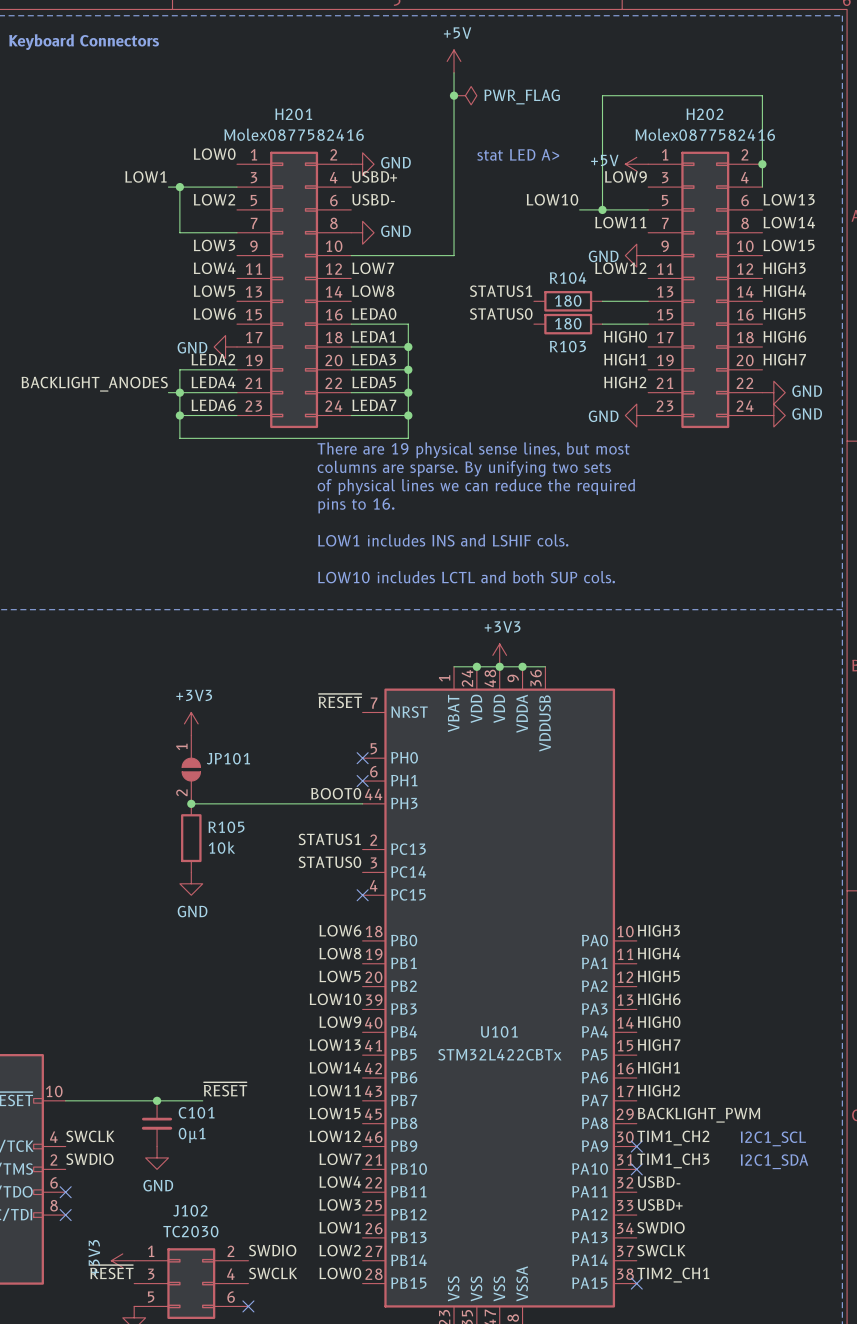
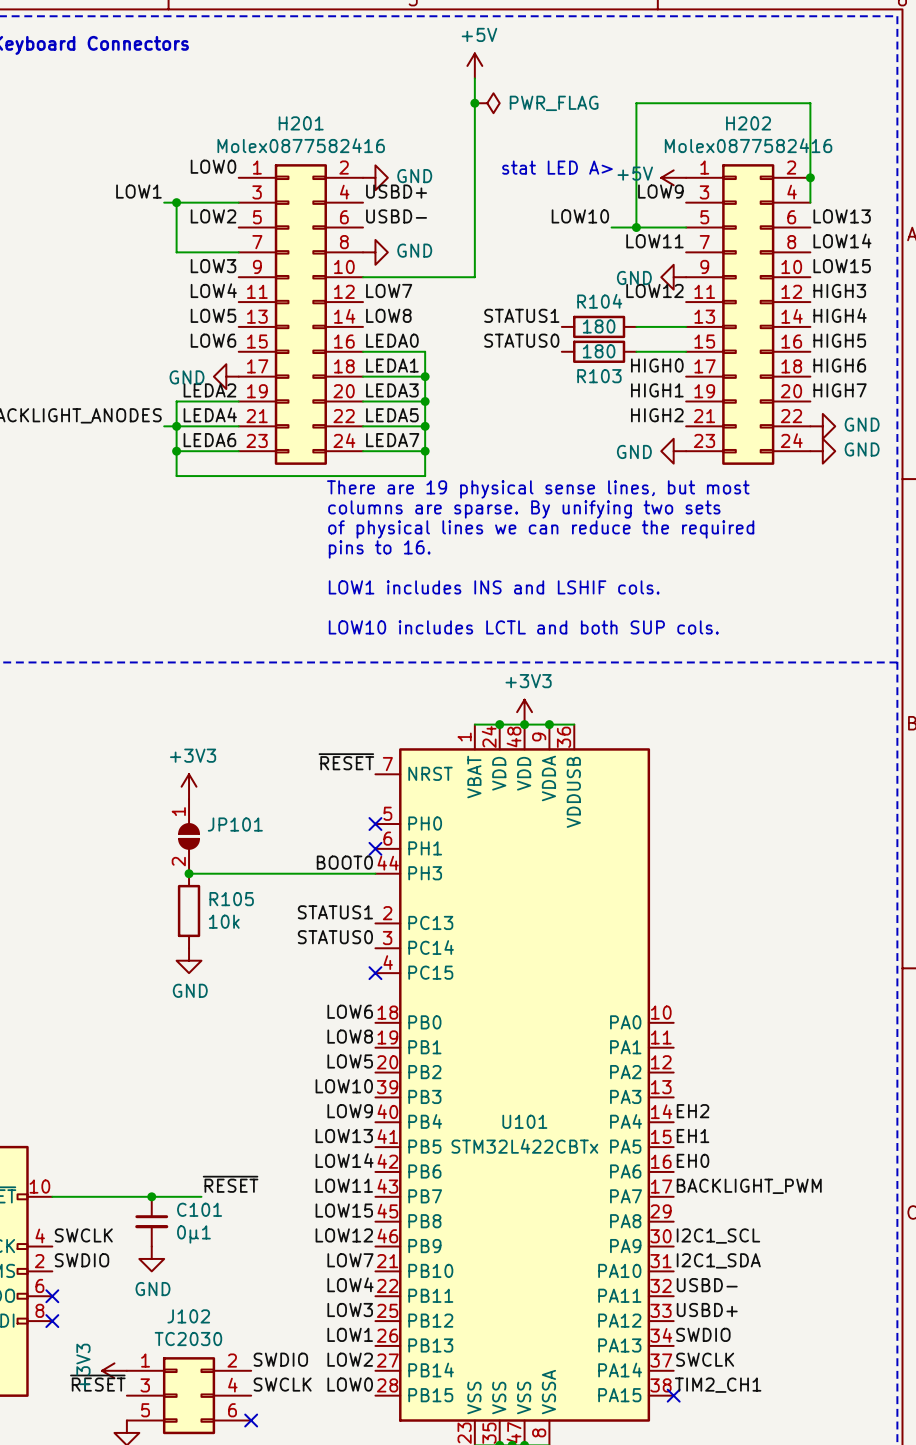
label: HIGH3 (658, 930) -> none
label: HIGH4 (659, 953) -> none
label: HIGH5 (658, 976) -> none
label: HIGH6 (659, 999) -> none
label: HIGH0 (659, 1022) -> EH2 (693, 1111)
label: HIGH7 (659, 1045) -> EH1 (693, 1136)
label: HIGH1 (658, 1067) -> EH0 (693, 1160)
label: HIGH2 (658, 1090) -> BACKLIGHT_PWM (749, 1186)
label: BACKLIGHT_PWM (699, 1115) -> none
label: TIM1_CH2 (673, 1138) -> I2C1_SCL (718, 1236)
text: I2C1_SCL (773, 1138) -> none
no-connect mark: (636, 1146) -> none
label: TIM1_CH3 (673, 1160) -> I2C1_SDA (718, 1260)
text: I2C1_SDA (774, 1161) -> none
no-connect mark: (636, 1169) -> none

